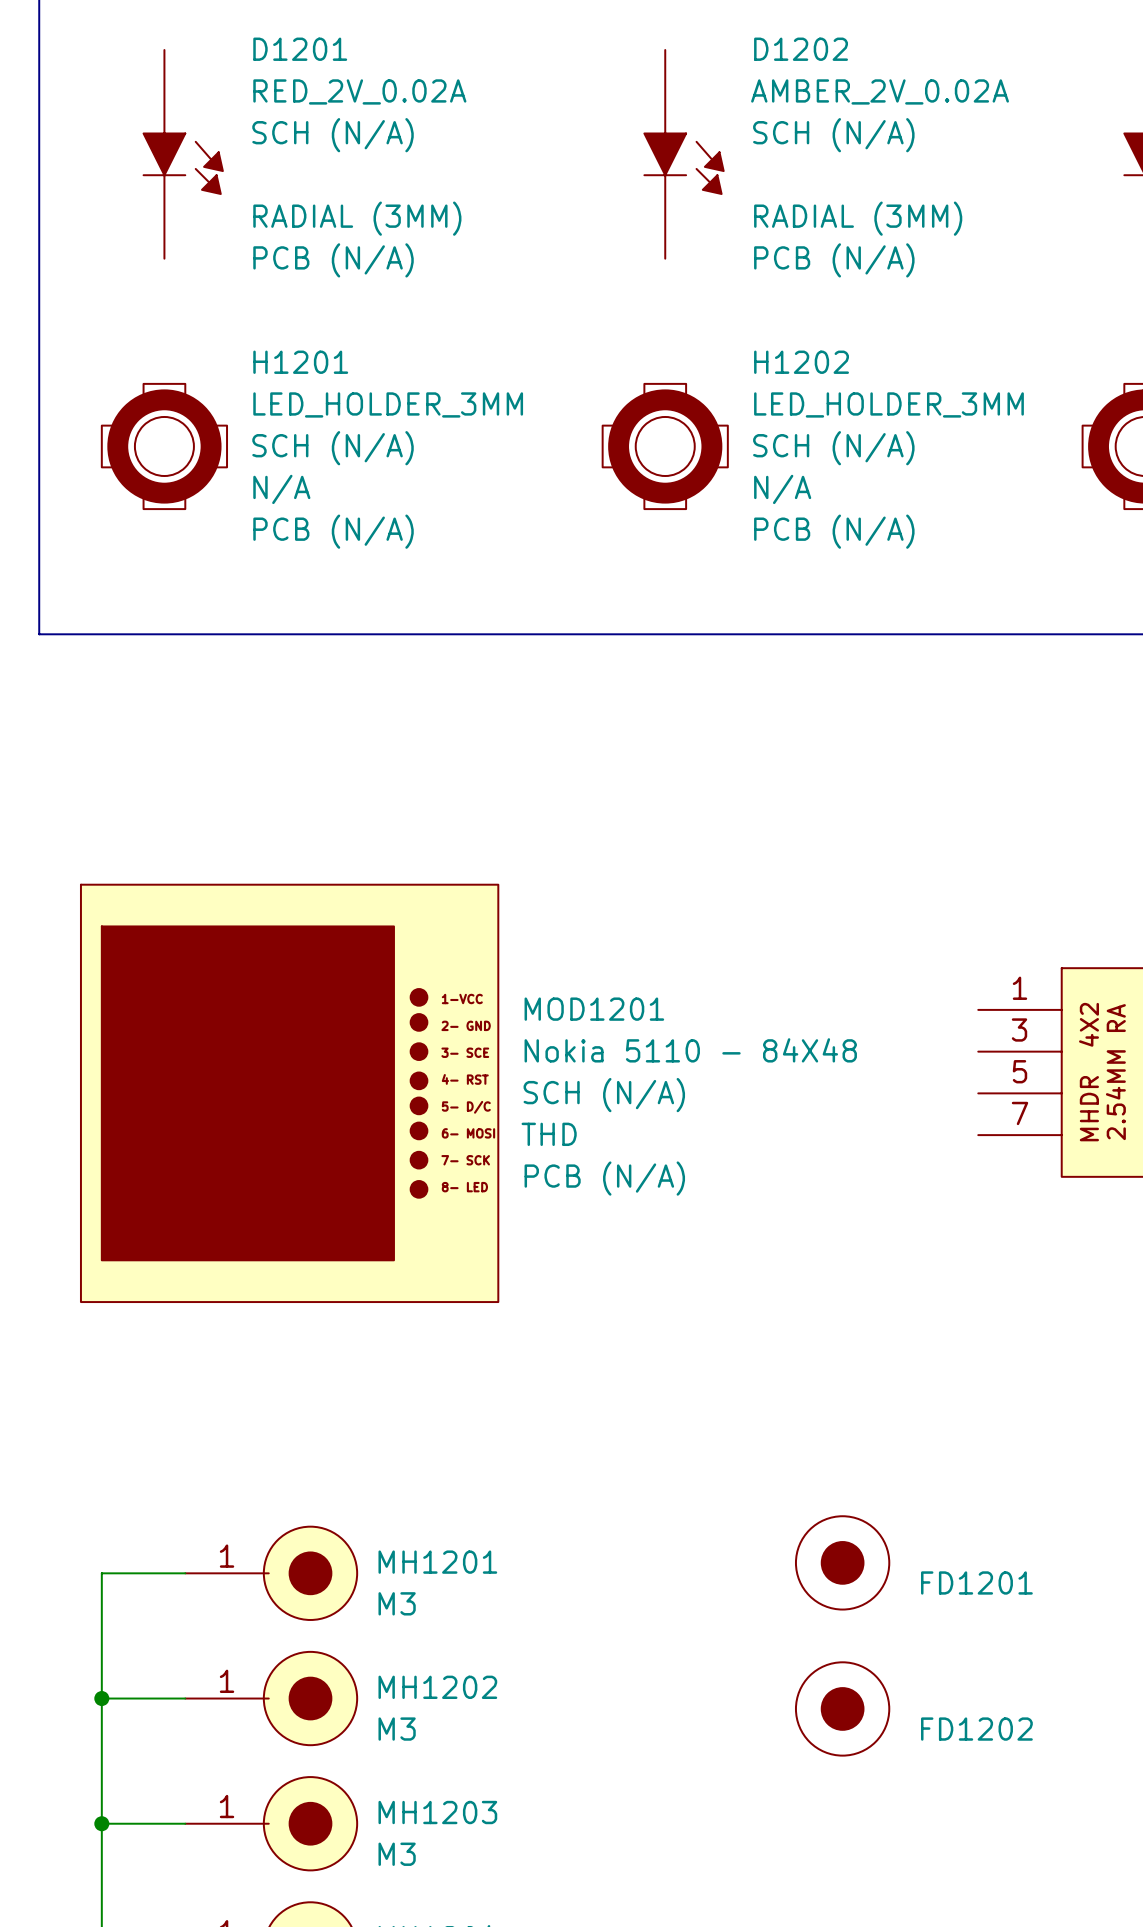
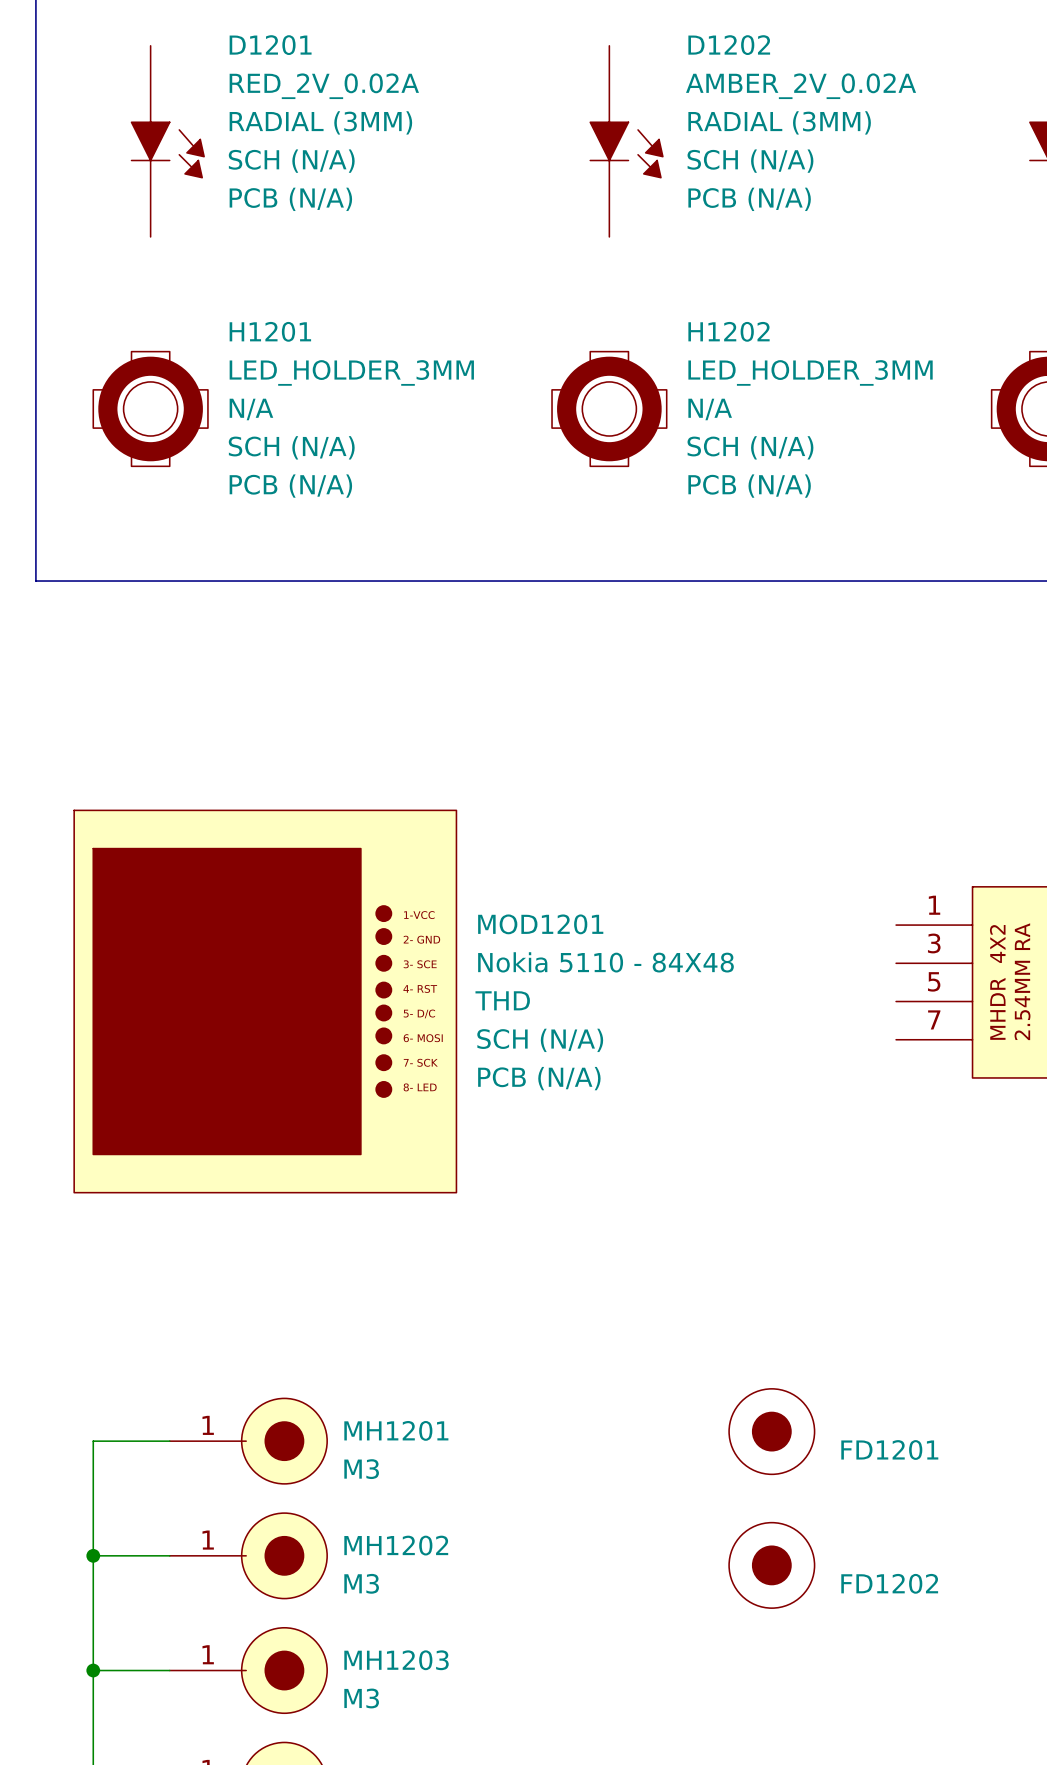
D1201 text position: SCH (N/A) (333, 135) -> SCH (N/A) (291, 161)
D1202 text position: SCH (N/A) (833, 135) -> SCH (N/A) (750, 161)
D1201 text position: RADIAL (3MM) (357, 218) -> RADIAL (3MM) (320, 122)
D1202 text position: RADIAL (3MM) (858, 218) -> RADIAL (3MM) (779, 122)
D1201 text position: PCB (N/A) (333, 260) -> PCB (N/A) (290, 199)
D1202 text position: PCB (N/A) (834, 260) -> PCB (N/A) (749, 199)
H1201 text position: SCH (N/A) (333, 448) -> SCH (N/A) (291, 447)
H1202 text position: SCH (N/A) (833, 448) -> SCH (N/A) (750, 447)
H1201 text position: N/A (281, 489) -> N/A (251, 409)
H1202 text position: N/A (782, 489) -> N/A (710, 409)
MOD1201 text position: SCH (N/A) (604, 1095) -> SCH (N/A) (540, 1040)
MOD1201 text position: THD (549, 1134) -> THD (502, 1000)

